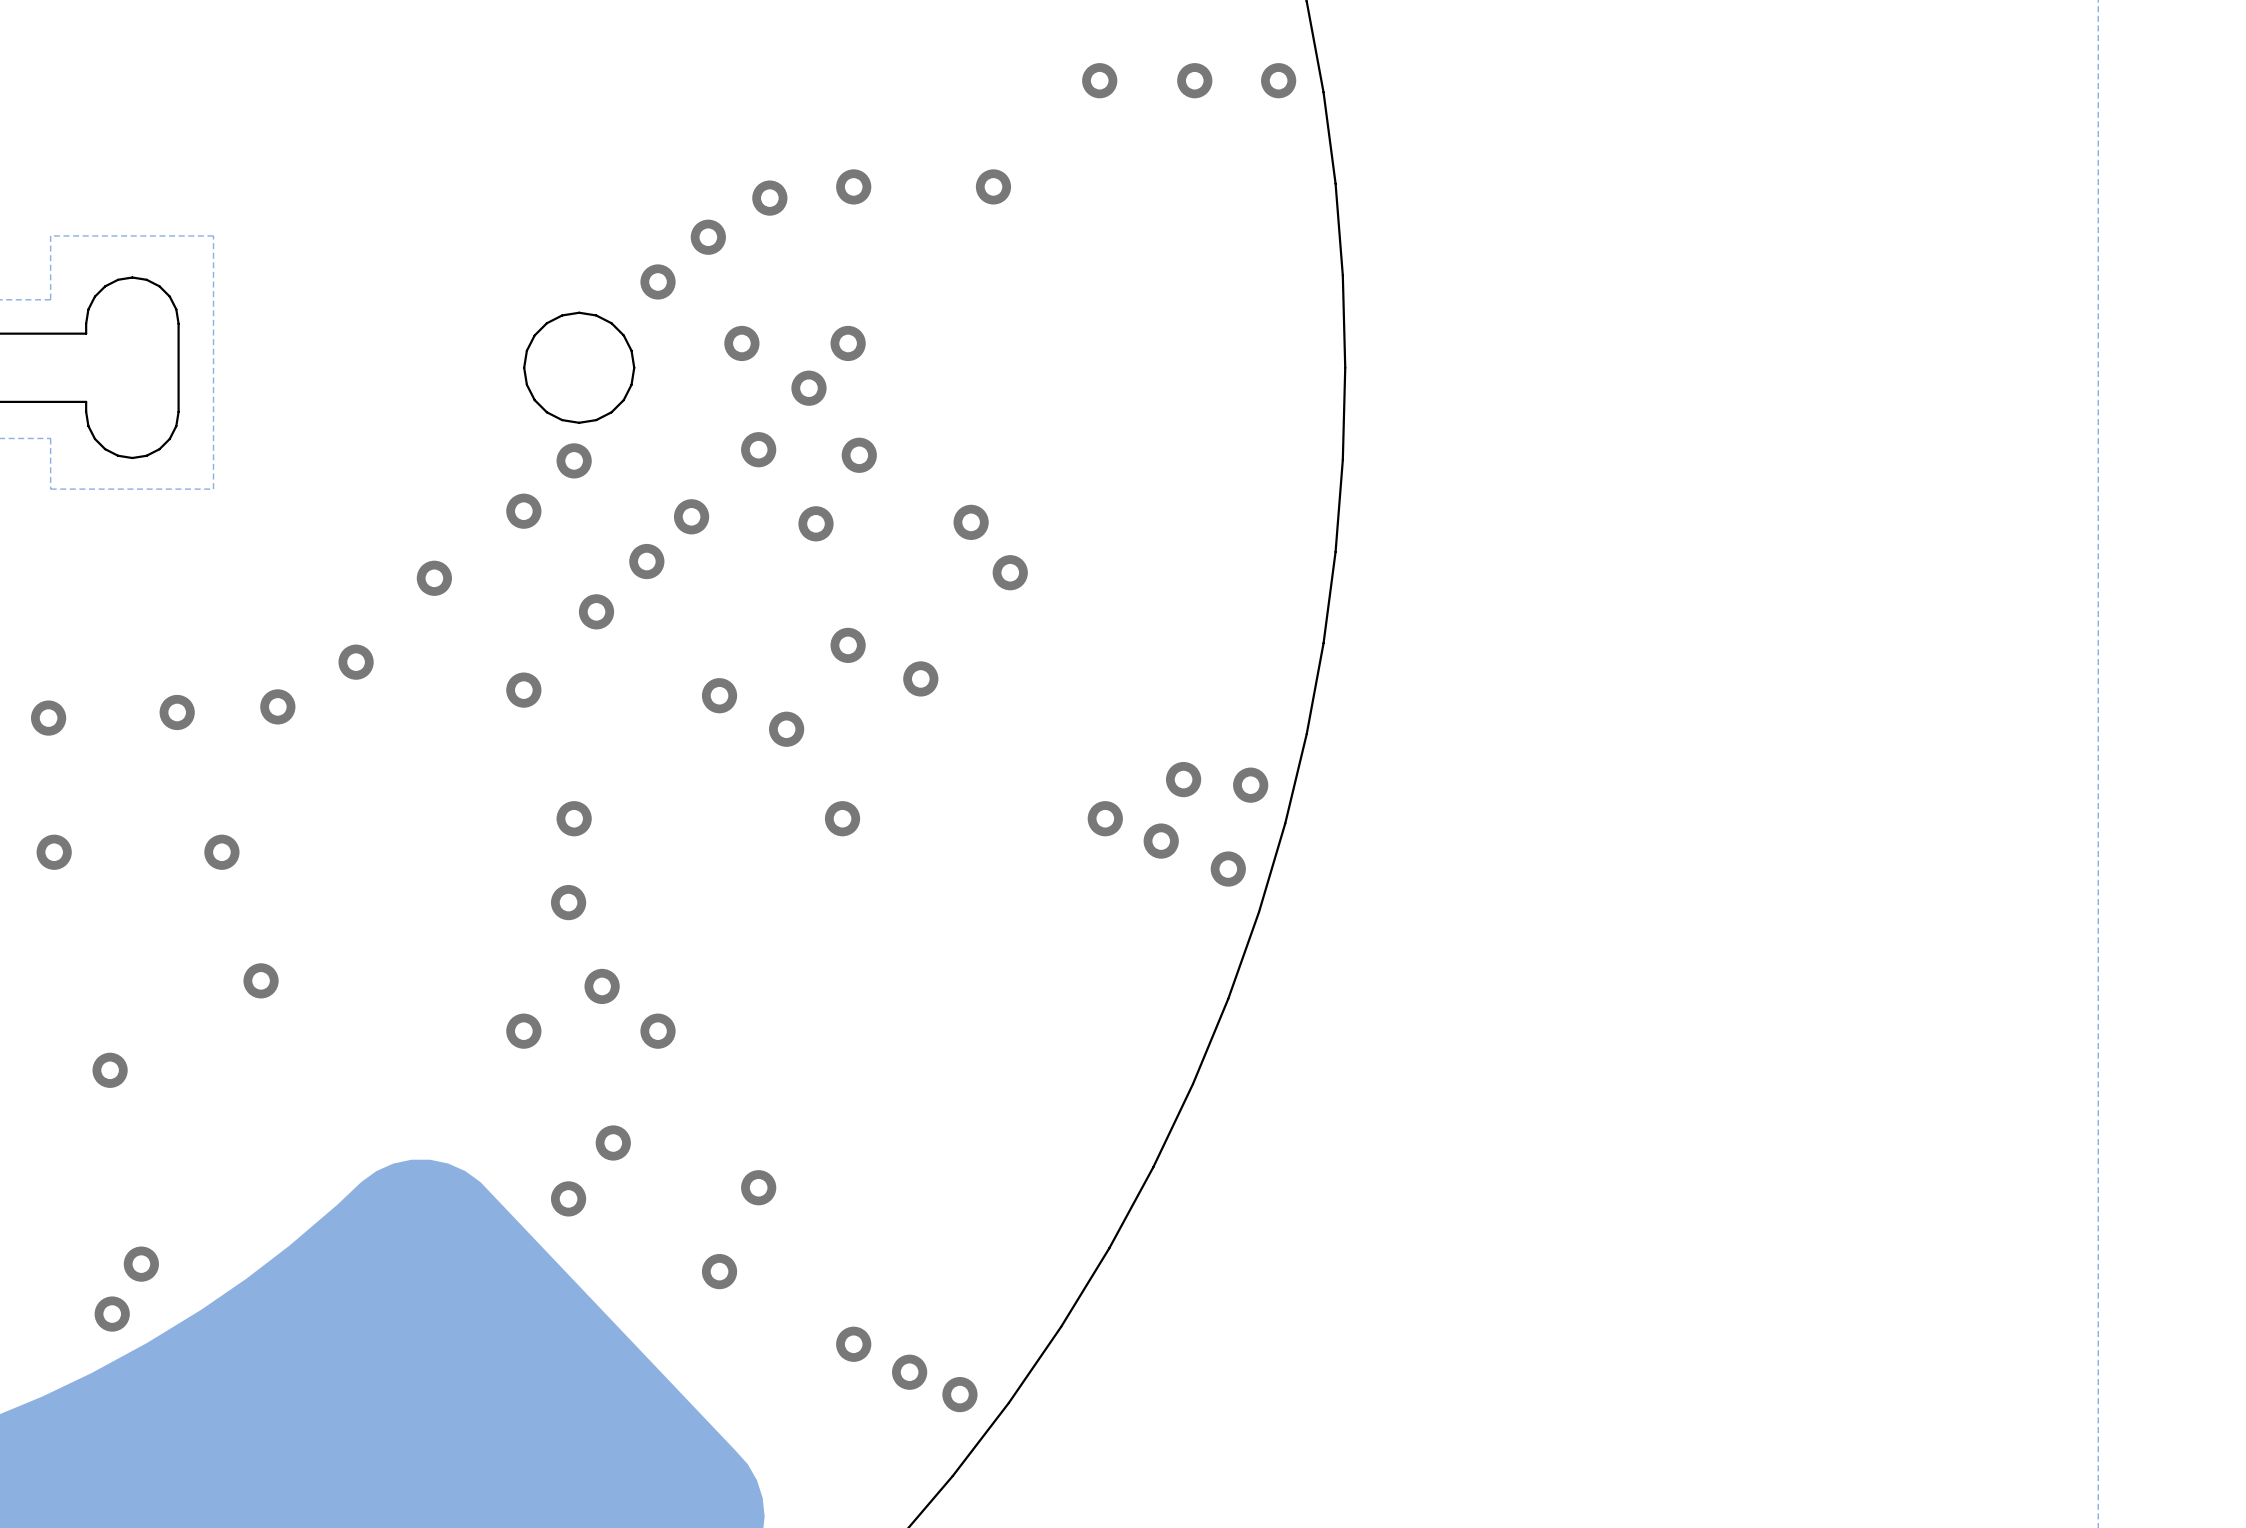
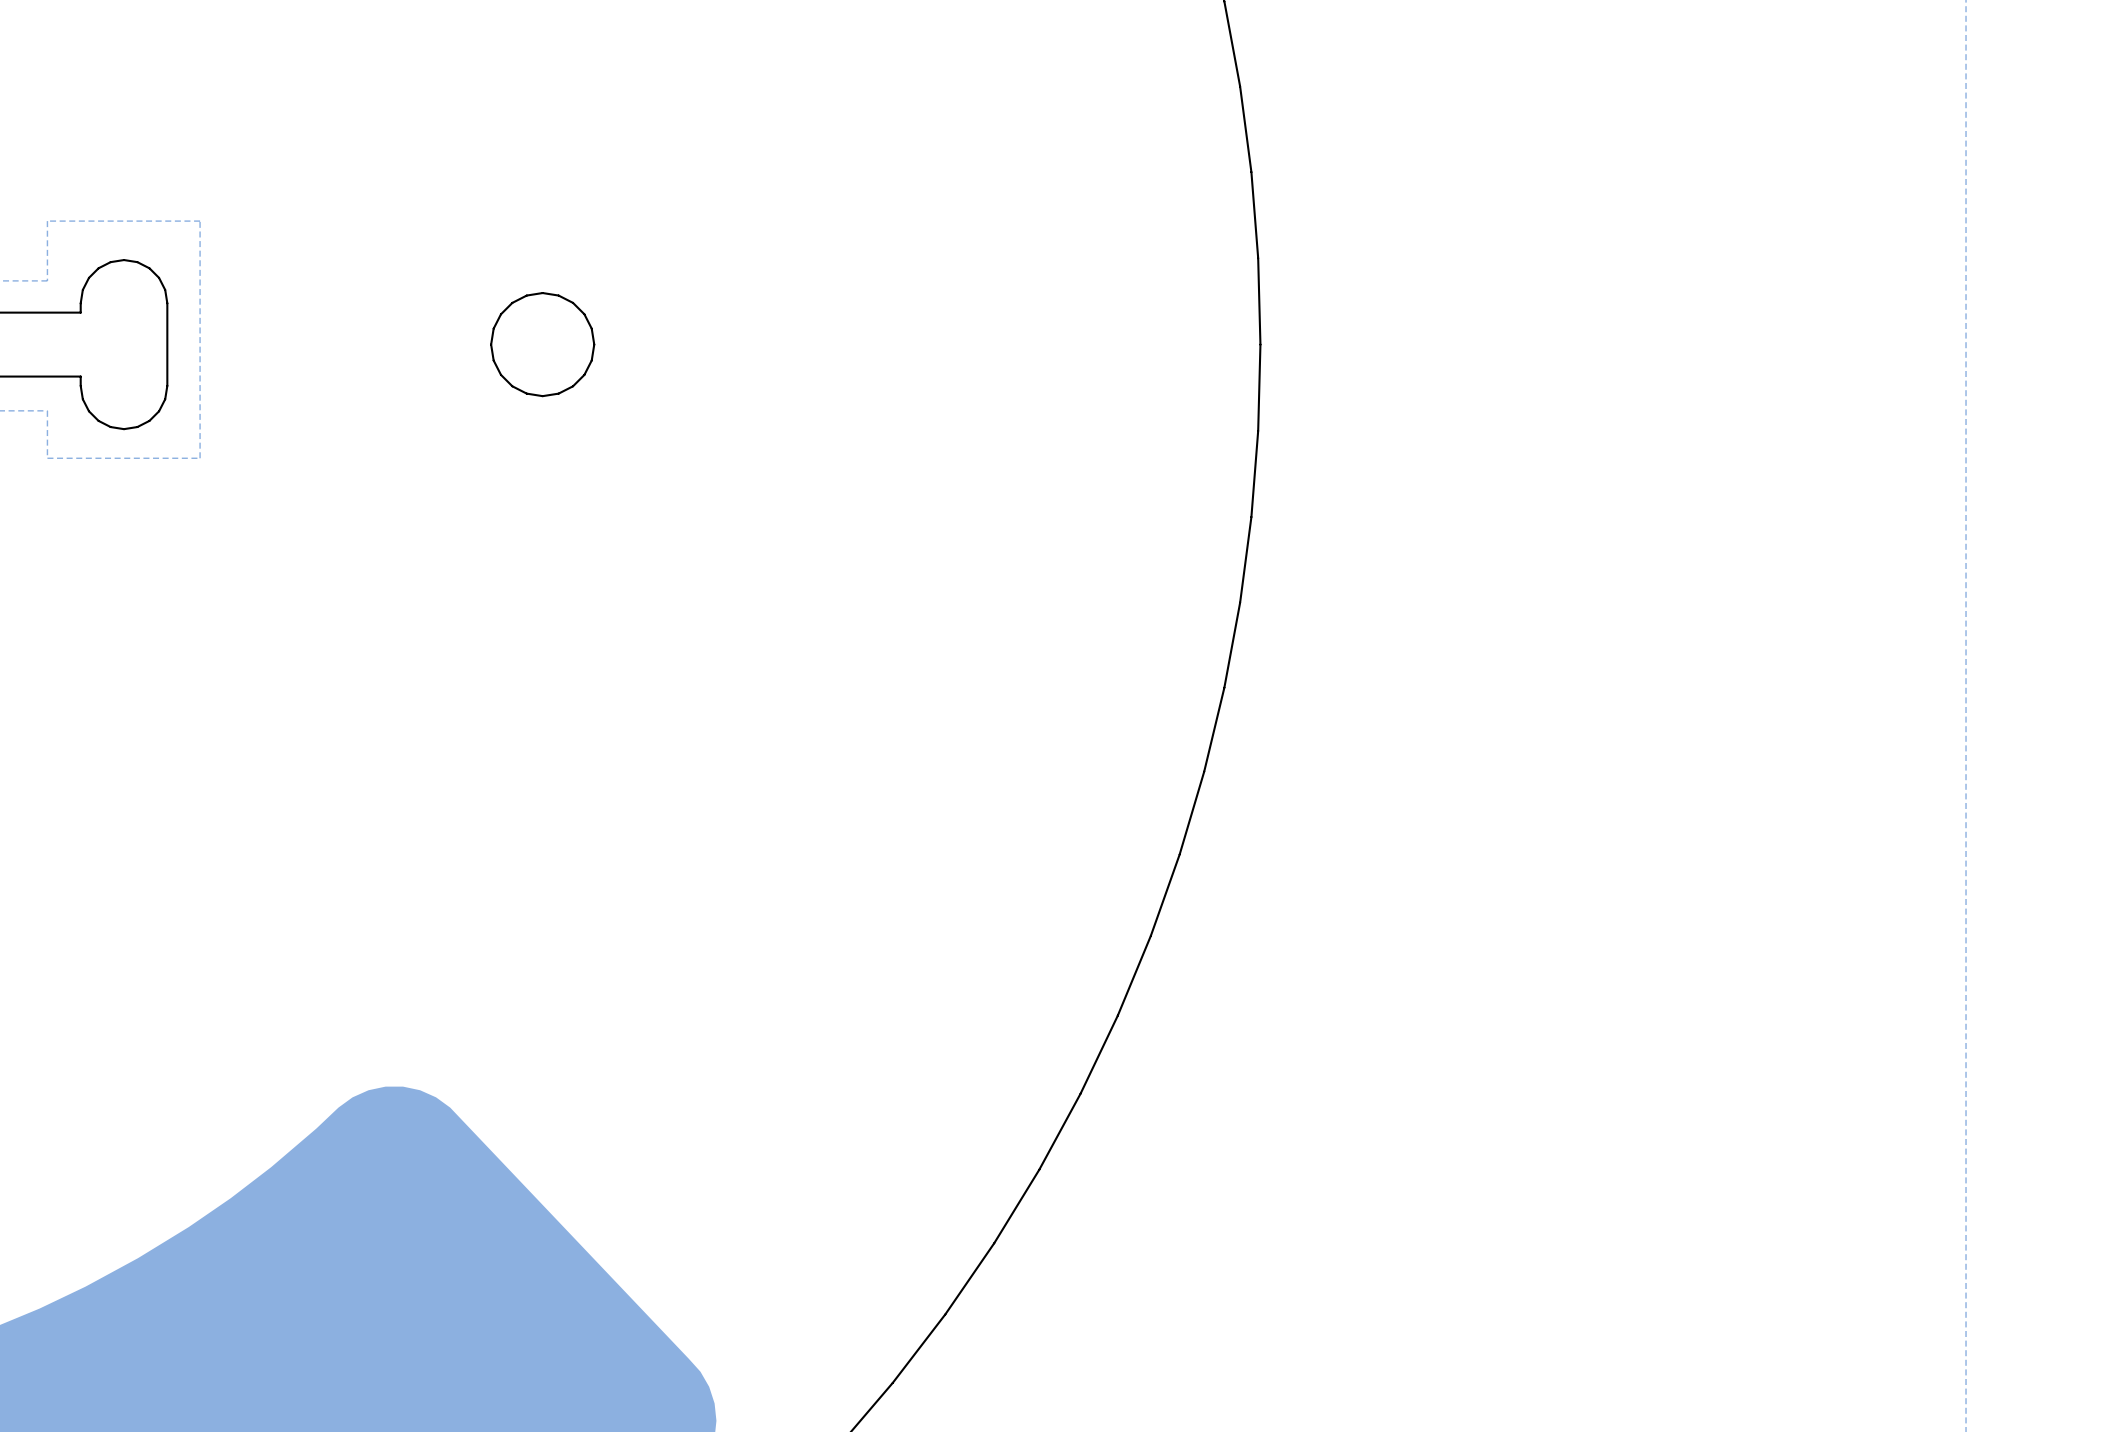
via: (1099, 80) -> none
via: (1194, 80) -> none
via: (1278, 80) -> none
via: (853, 186) -> none
via: (993, 186) -> none
via: (769, 198) -> none
via: (708, 237) -> none
via: (658, 281) -> none
via: (741, 343) -> none
via: (848, 343) -> none
via: (808, 388) -> none
via: (758, 449) -> none
via: (859, 455) -> none
via: (574, 460) -> none
via: (523, 511) -> none
via: (691, 516) -> none
via: (971, 522) -> none
via: (816, 523) -> none
via: (646, 561) -> none
via: (1010, 572) -> none
via: (434, 578) -> none
via: (596, 611) -> none
via: (848, 645) -> none
via: (356, 662) -> none
via: (920, 678) -> none
via: (523, 690) -> none
via: (719, 695) -> none
via: (277, 706) -> none
via: (177, 712) -> none
via: (48, 718) -> none
via: (786, 729) -> none
via: (1183, 779) -> none
via: (1250, 785) -> none
via: (574, 818) -> none
via: (842, 818) -> none
via: (1105, 818) -> none
via: (1161, 841) -> none
via: (54, 852) -> none
via: (221, 852) -> none
via: (1228, 869) -> none
via: (568, 902) -> none
via: (261, 980) -> none
via: (602, 986) -> none
via: (523, 1031) -> none
via: (658, 1031) -> none
via: (110, 1070) -> none
via: (613, 1143) -> none
via: (758, 1187) -> none
via: (568, 1198) -> none
via: (141, 1264) -> none
via: (719, 1271) -> none
via: (112, 1314) -> none
via: (853, 1344) -> none
via: (909, 1372) -> none
via: (959, 1394) -> none

